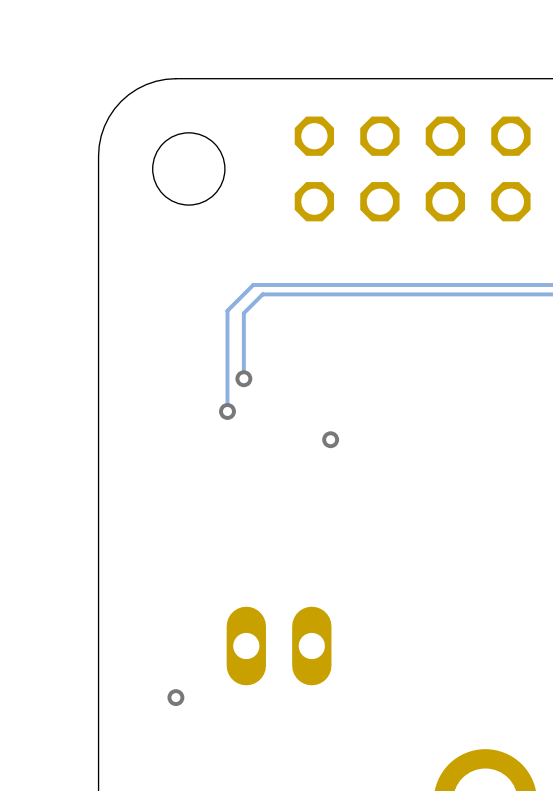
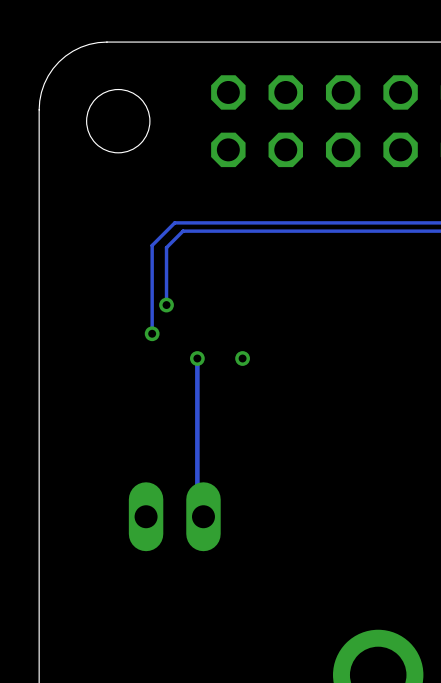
track: none -> (197, 358) (197, 510) (203, 516)
via: none -> (197, 358)
part position: (279, 646) -> (174, 516)
via: (175, 697) -> none

